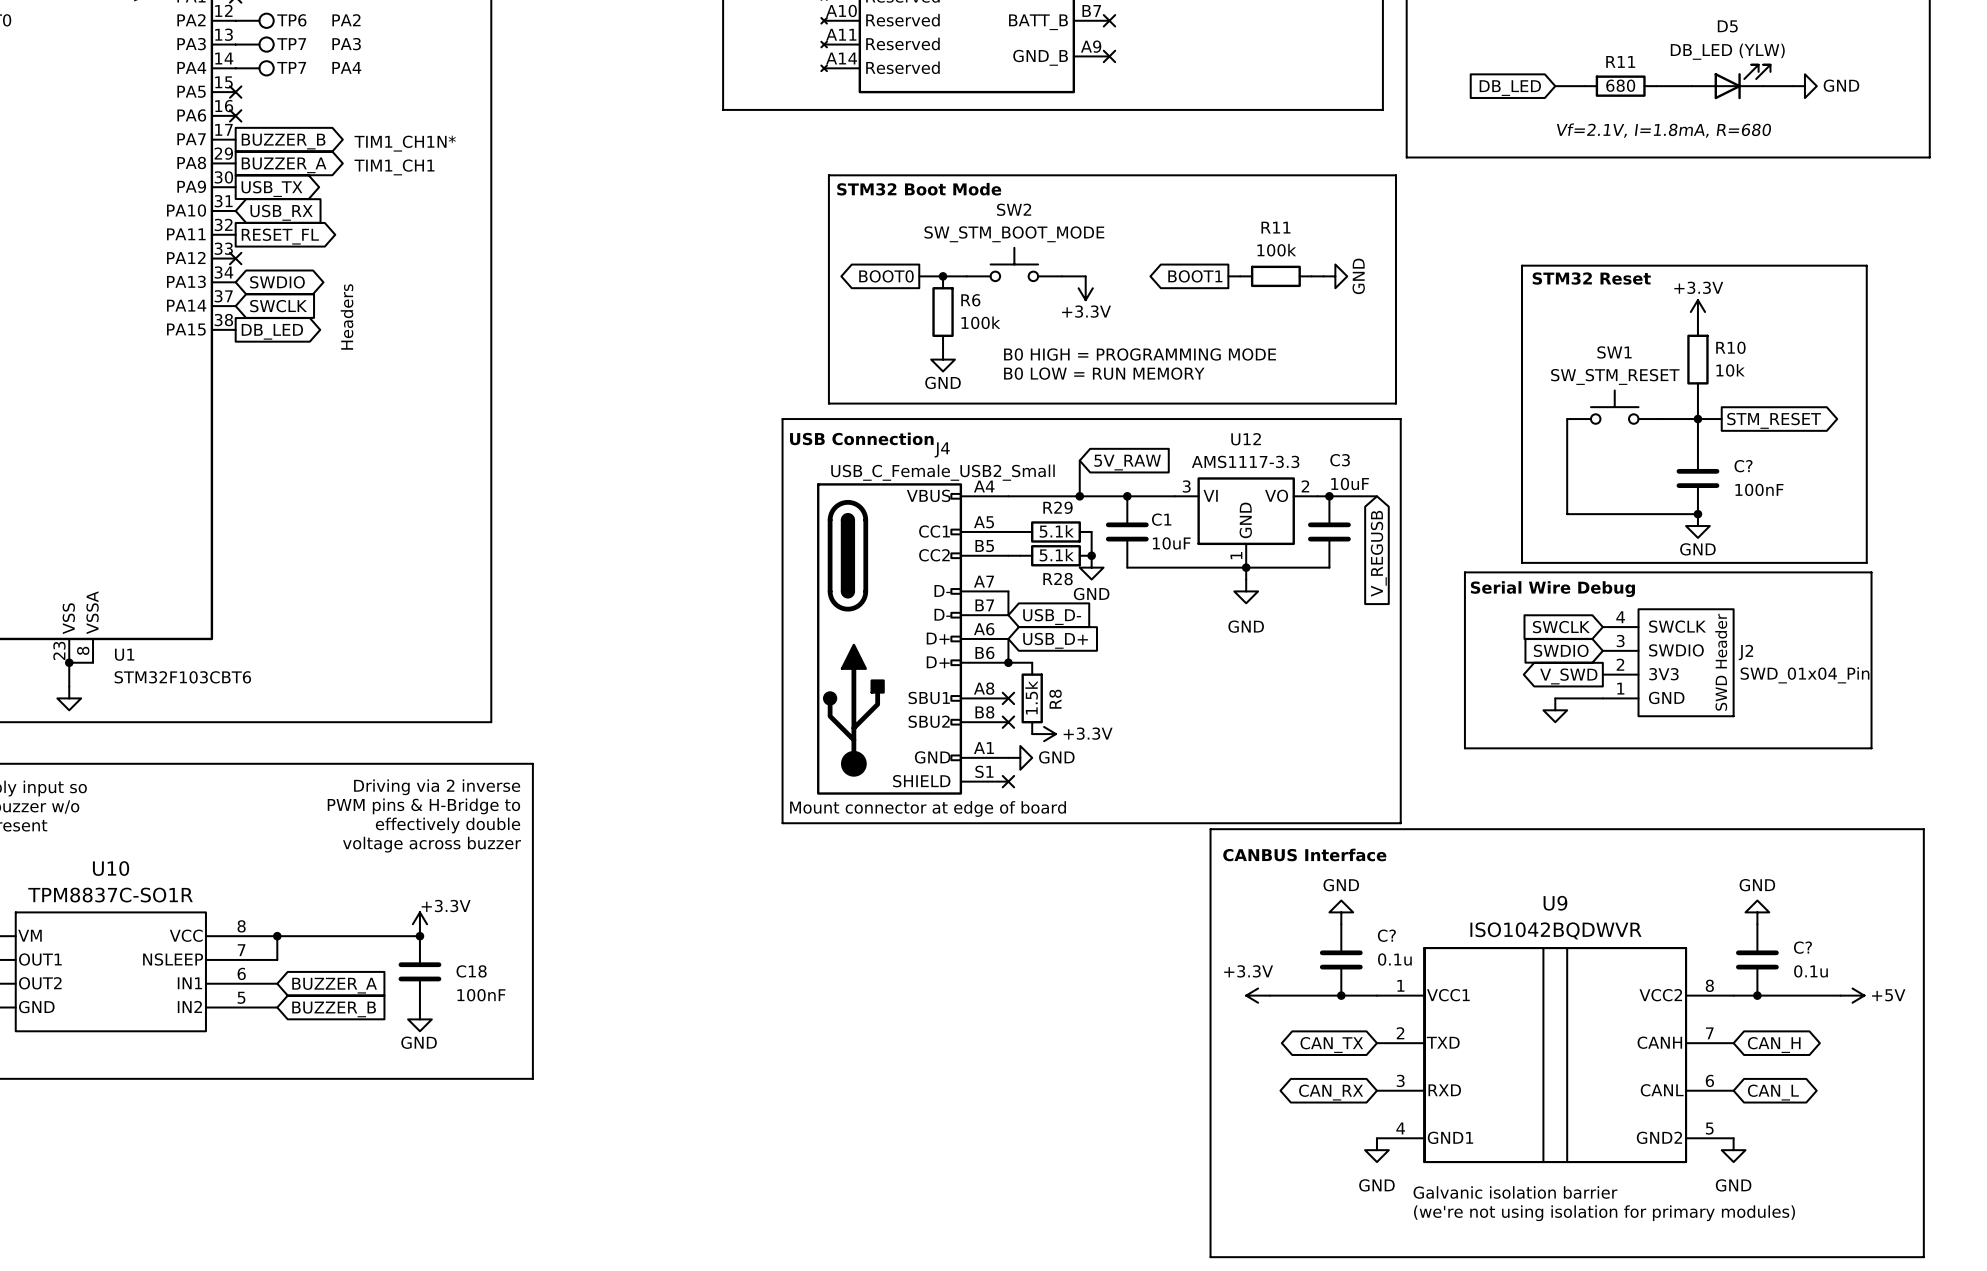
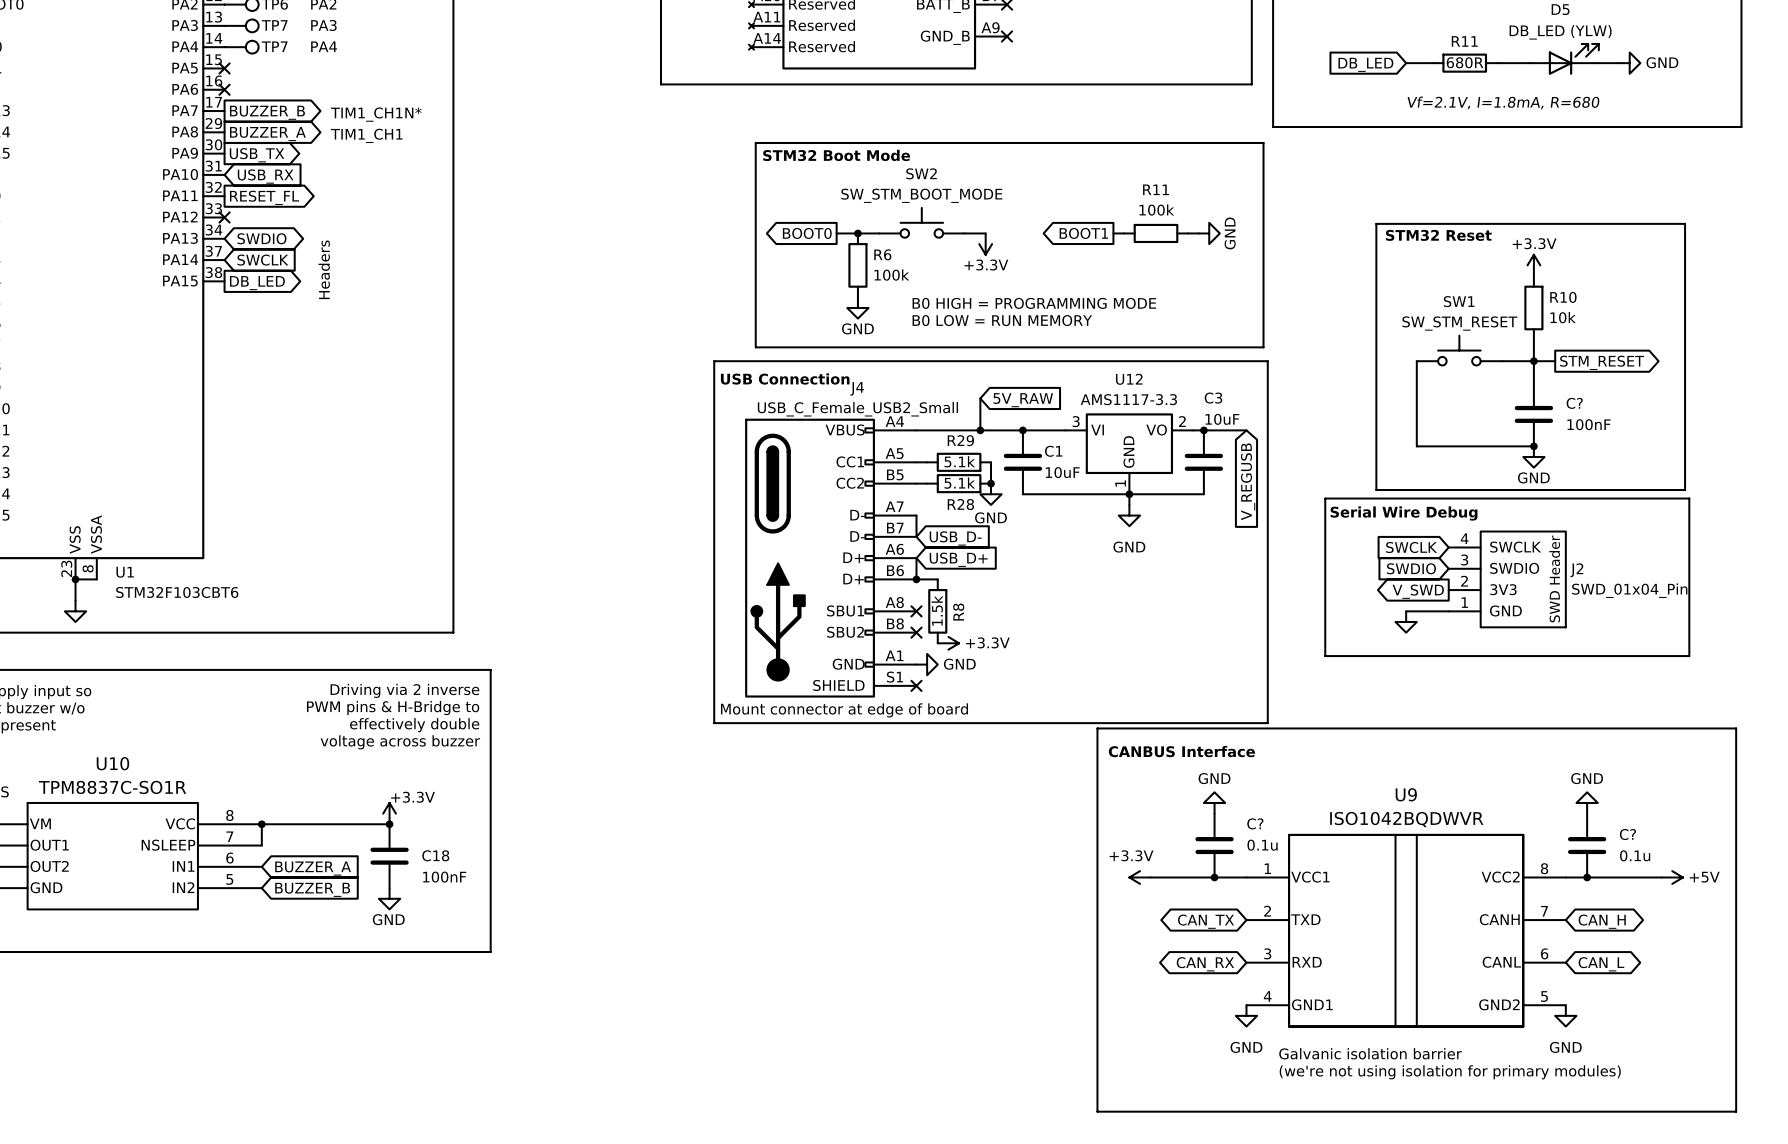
R11 value: 680 (1620, 85) -> 680R (1465, 62)

